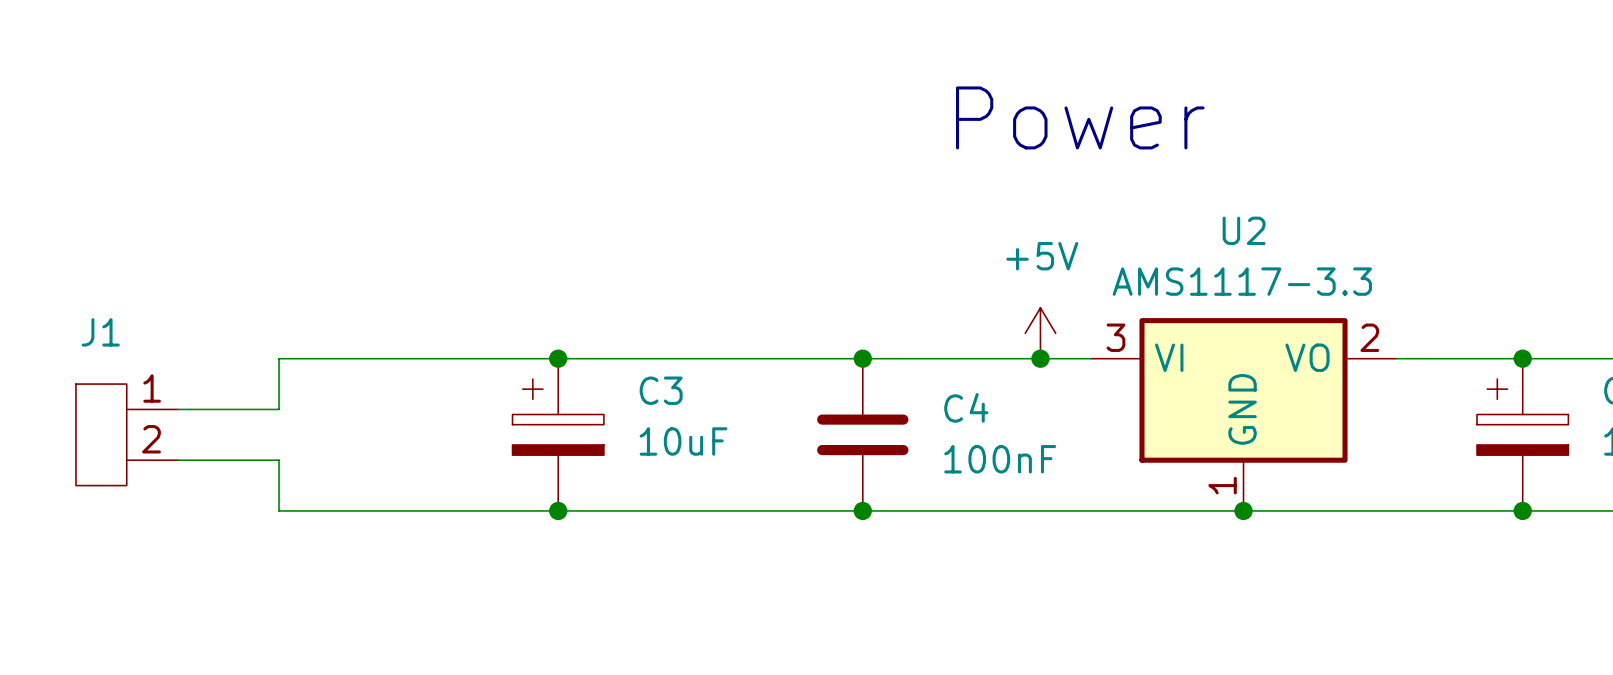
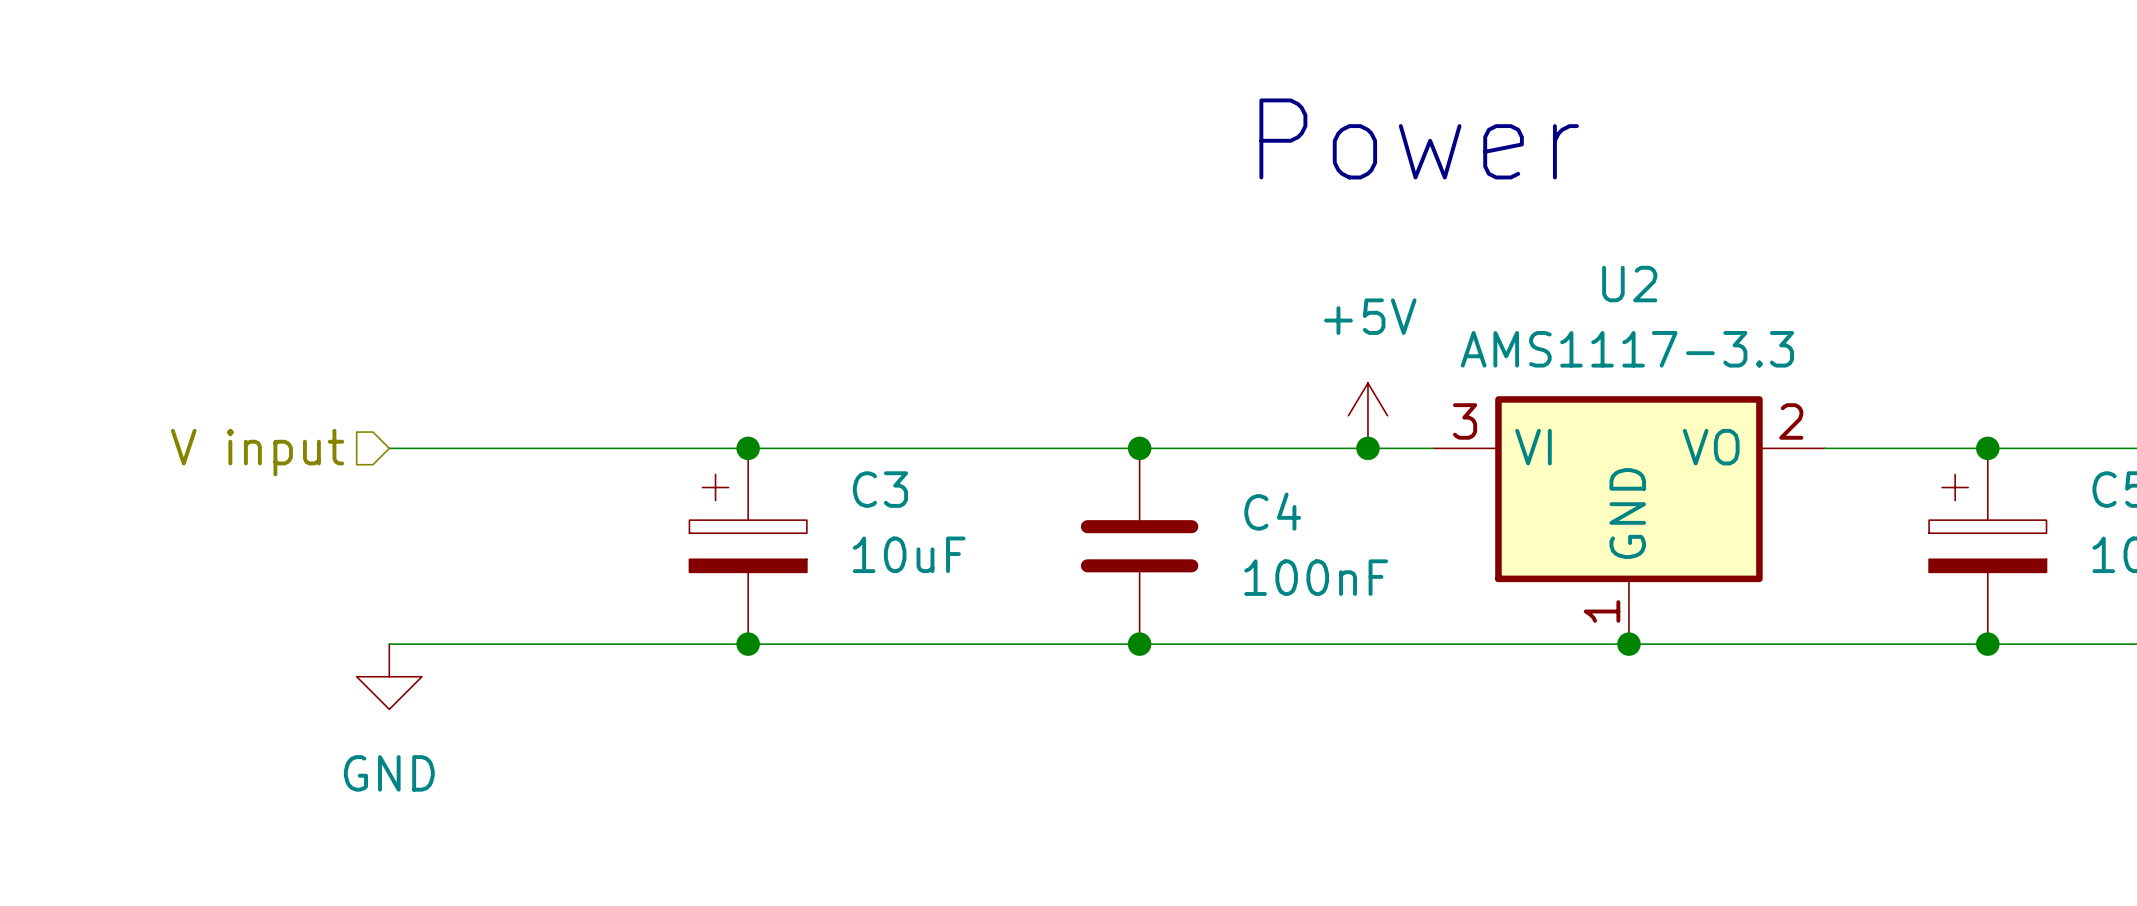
wire: (279, 358) (279, 409) (177, 409) -> none
hierarchical label: none -> V input (257, 452)
J1: (126, 434) -> none
wire: (177, 460) (279, 460) (279, 510) -> none
power symbol: none -> GND (389, 676)

